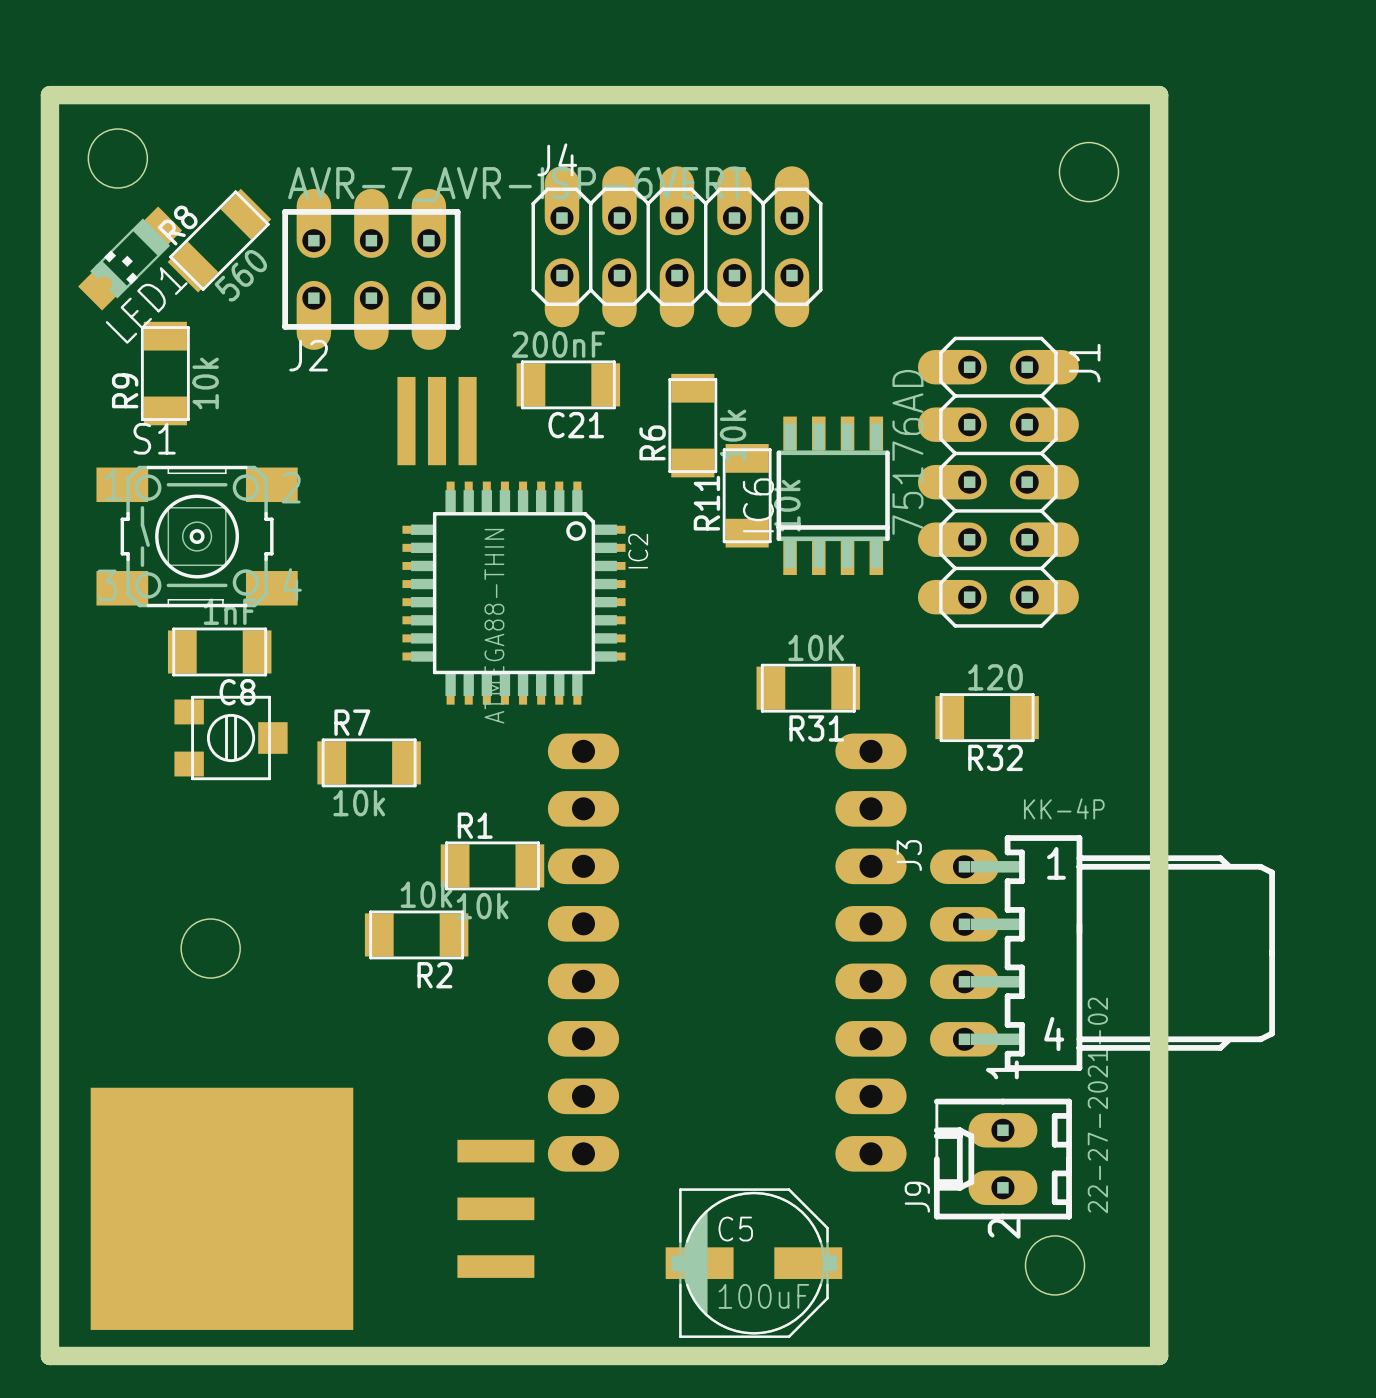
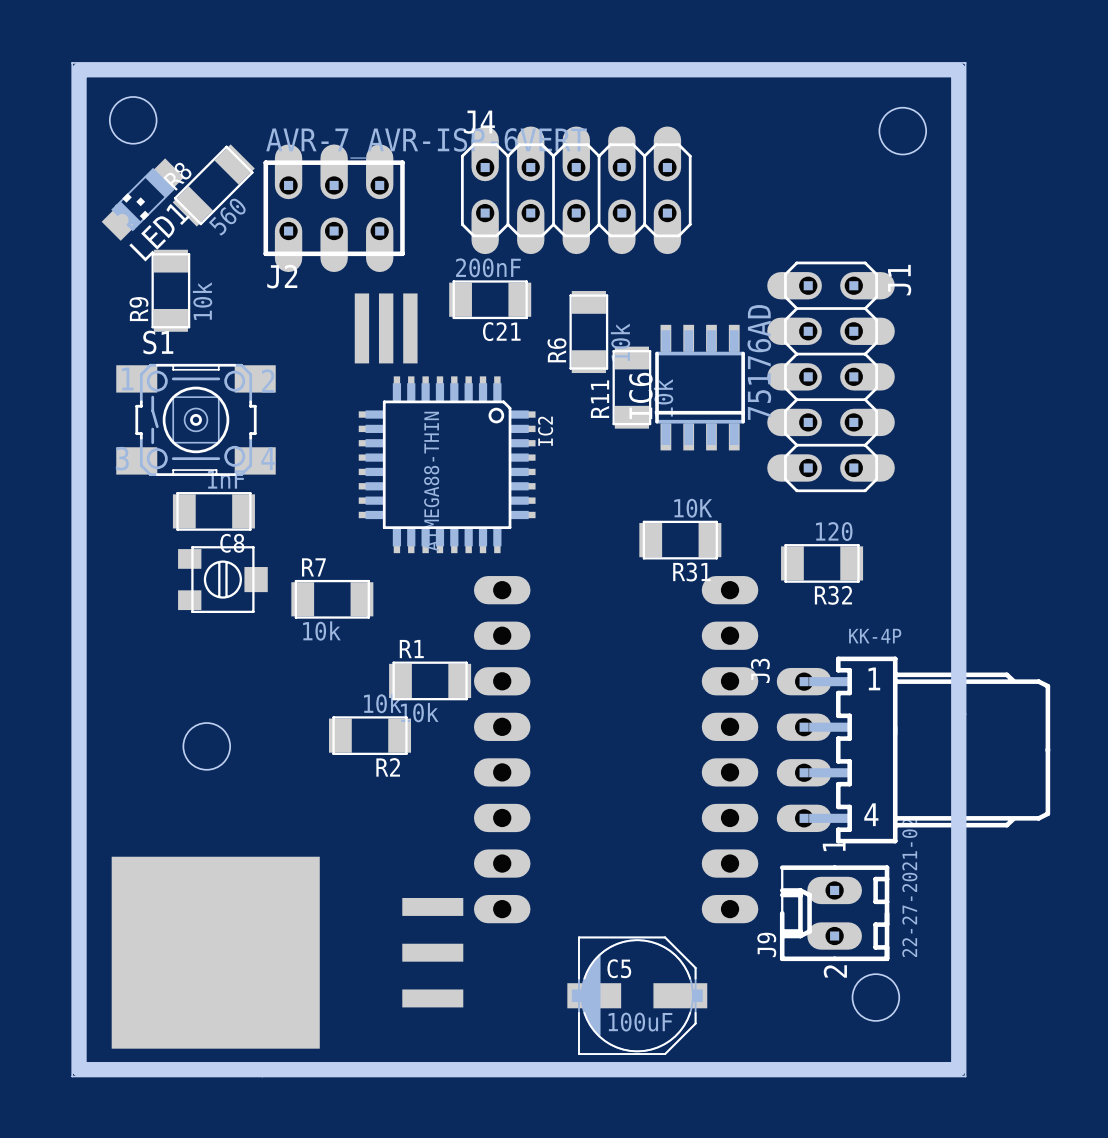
board edge: none -> (72, 62) (965, 62) (965, 1076) (72, 1076) (72, 62)

